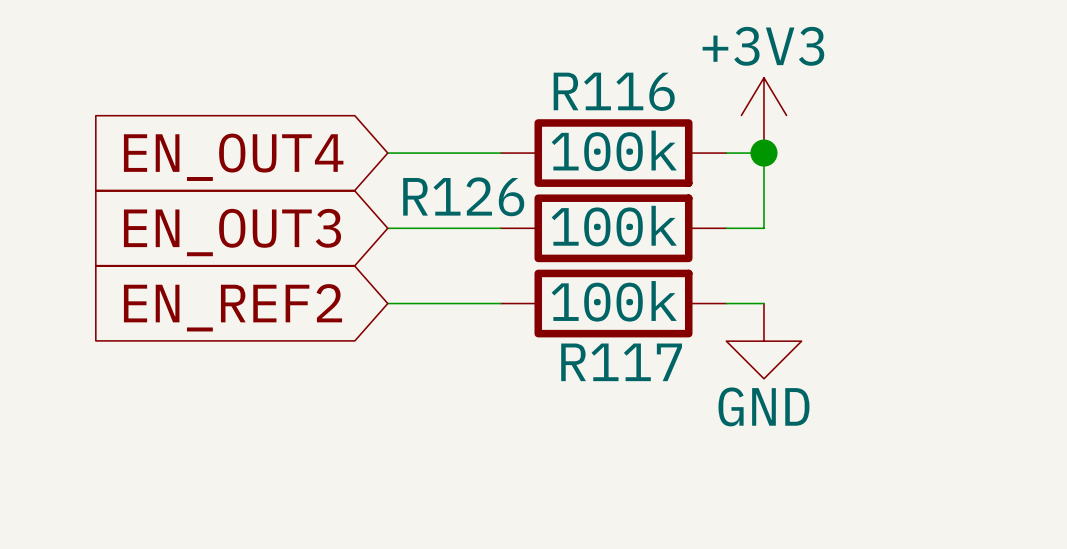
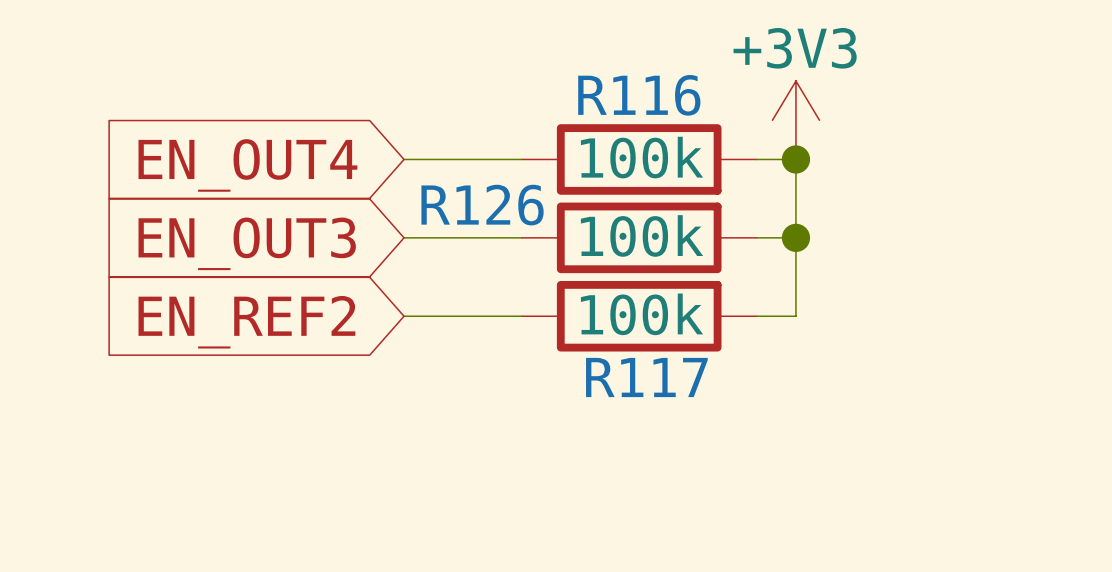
wire: none -> (795, 237) (795, 316)
junction: none -> (795, 237)
power symbol: GND (763, 341) -> none

